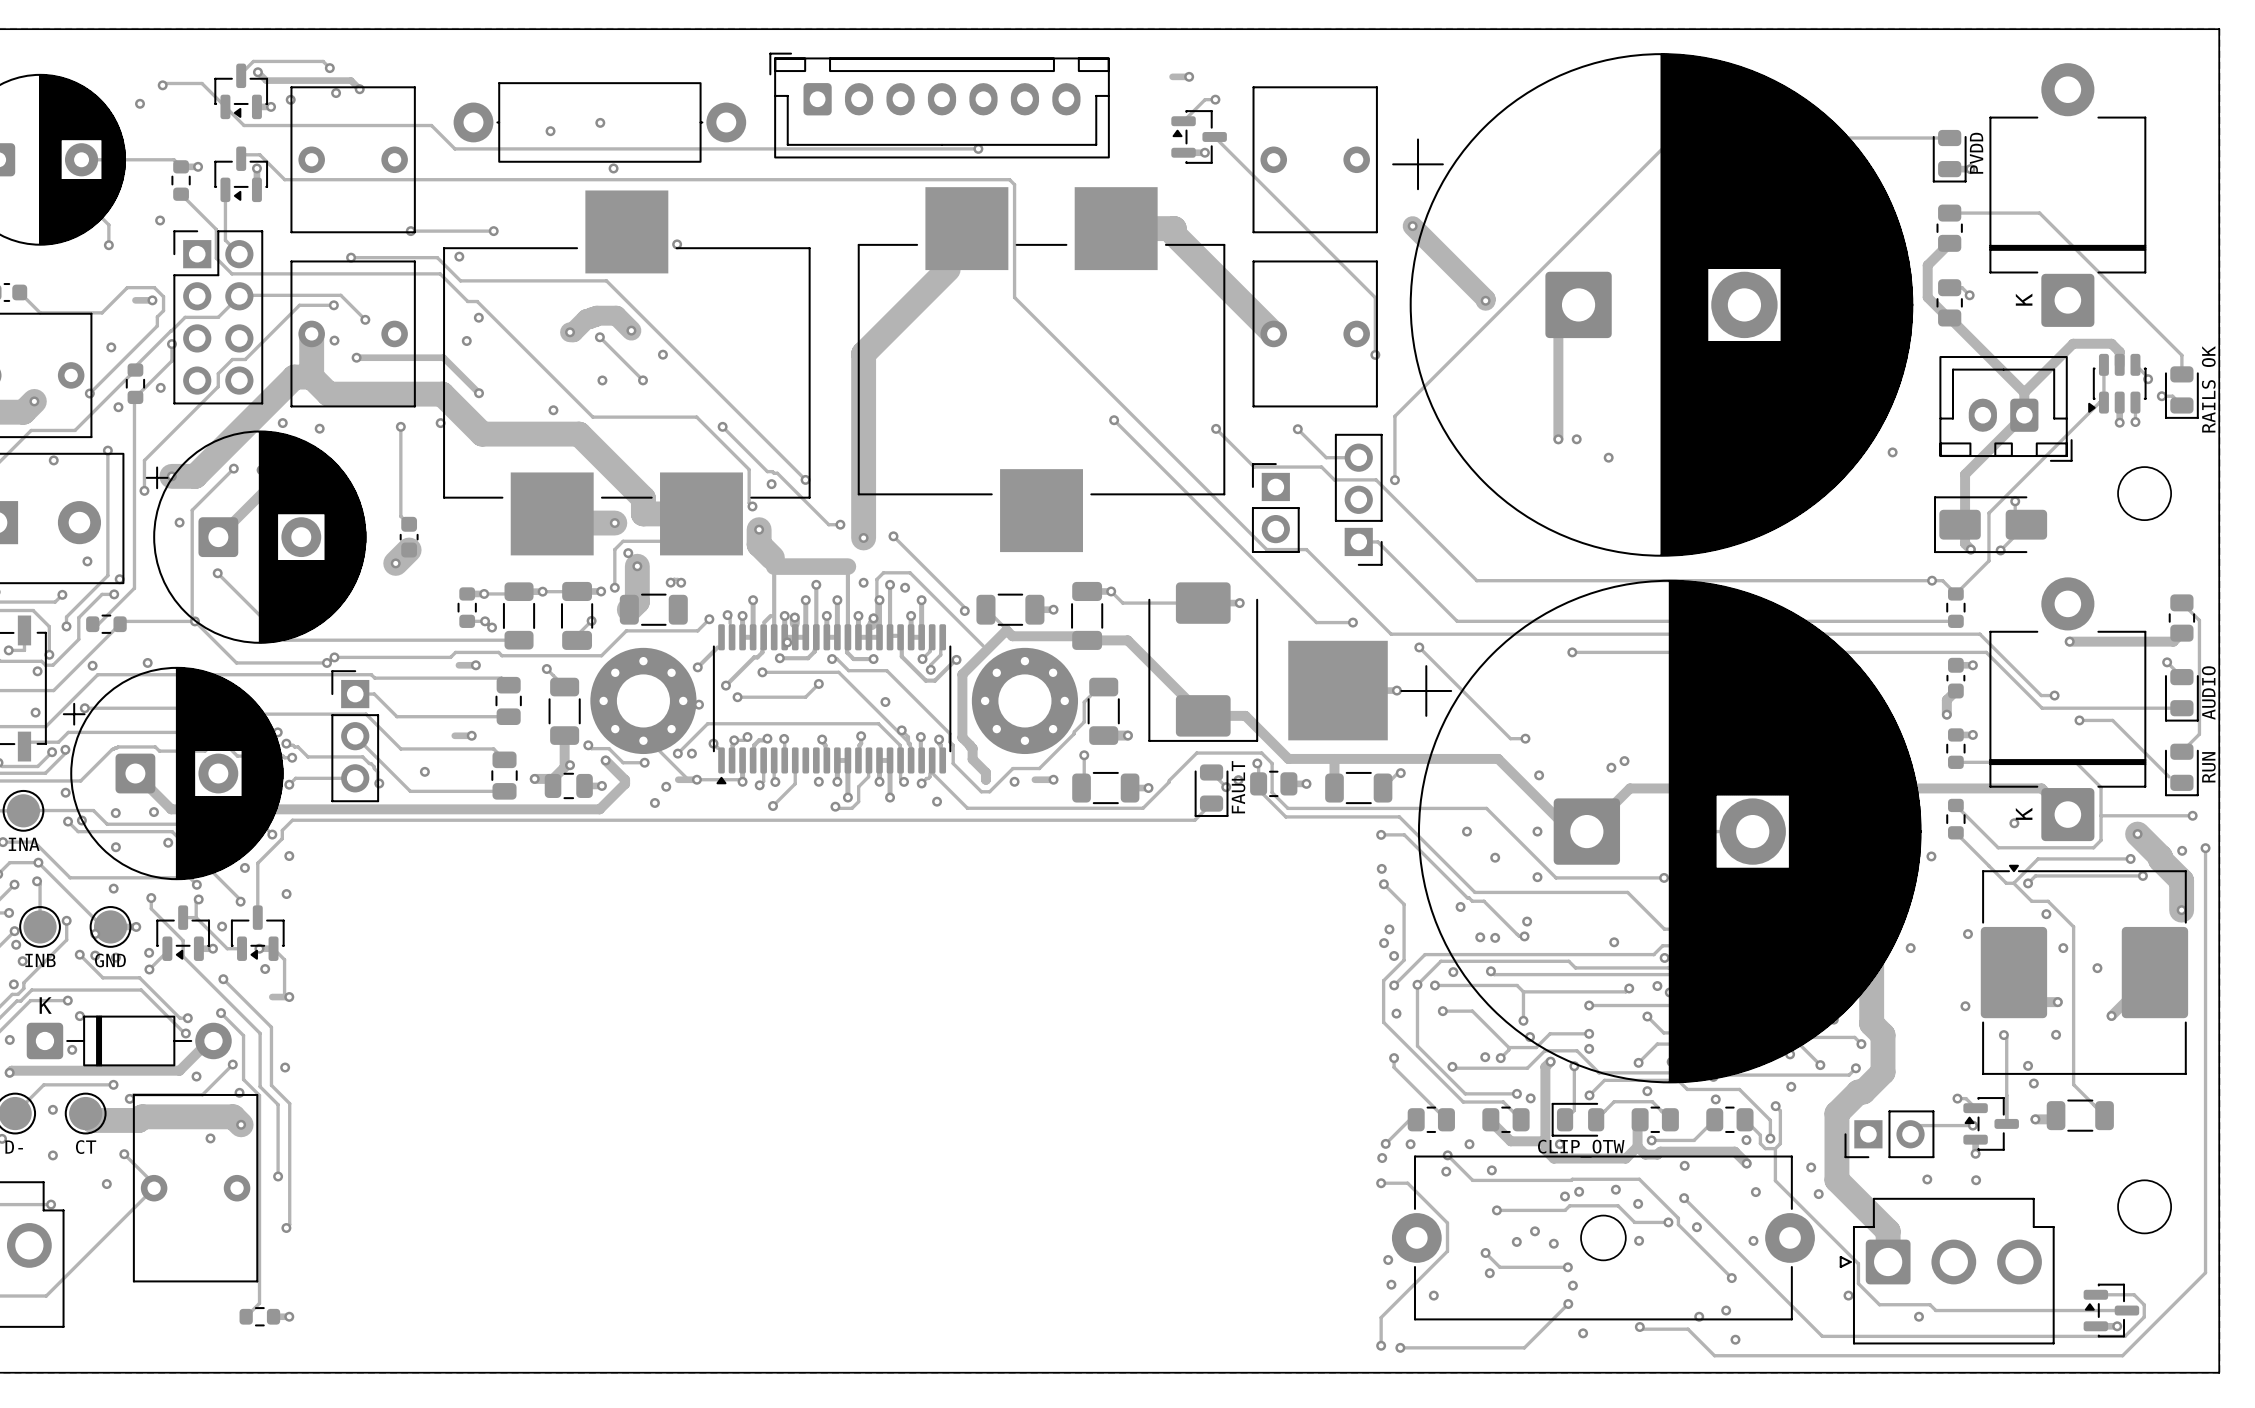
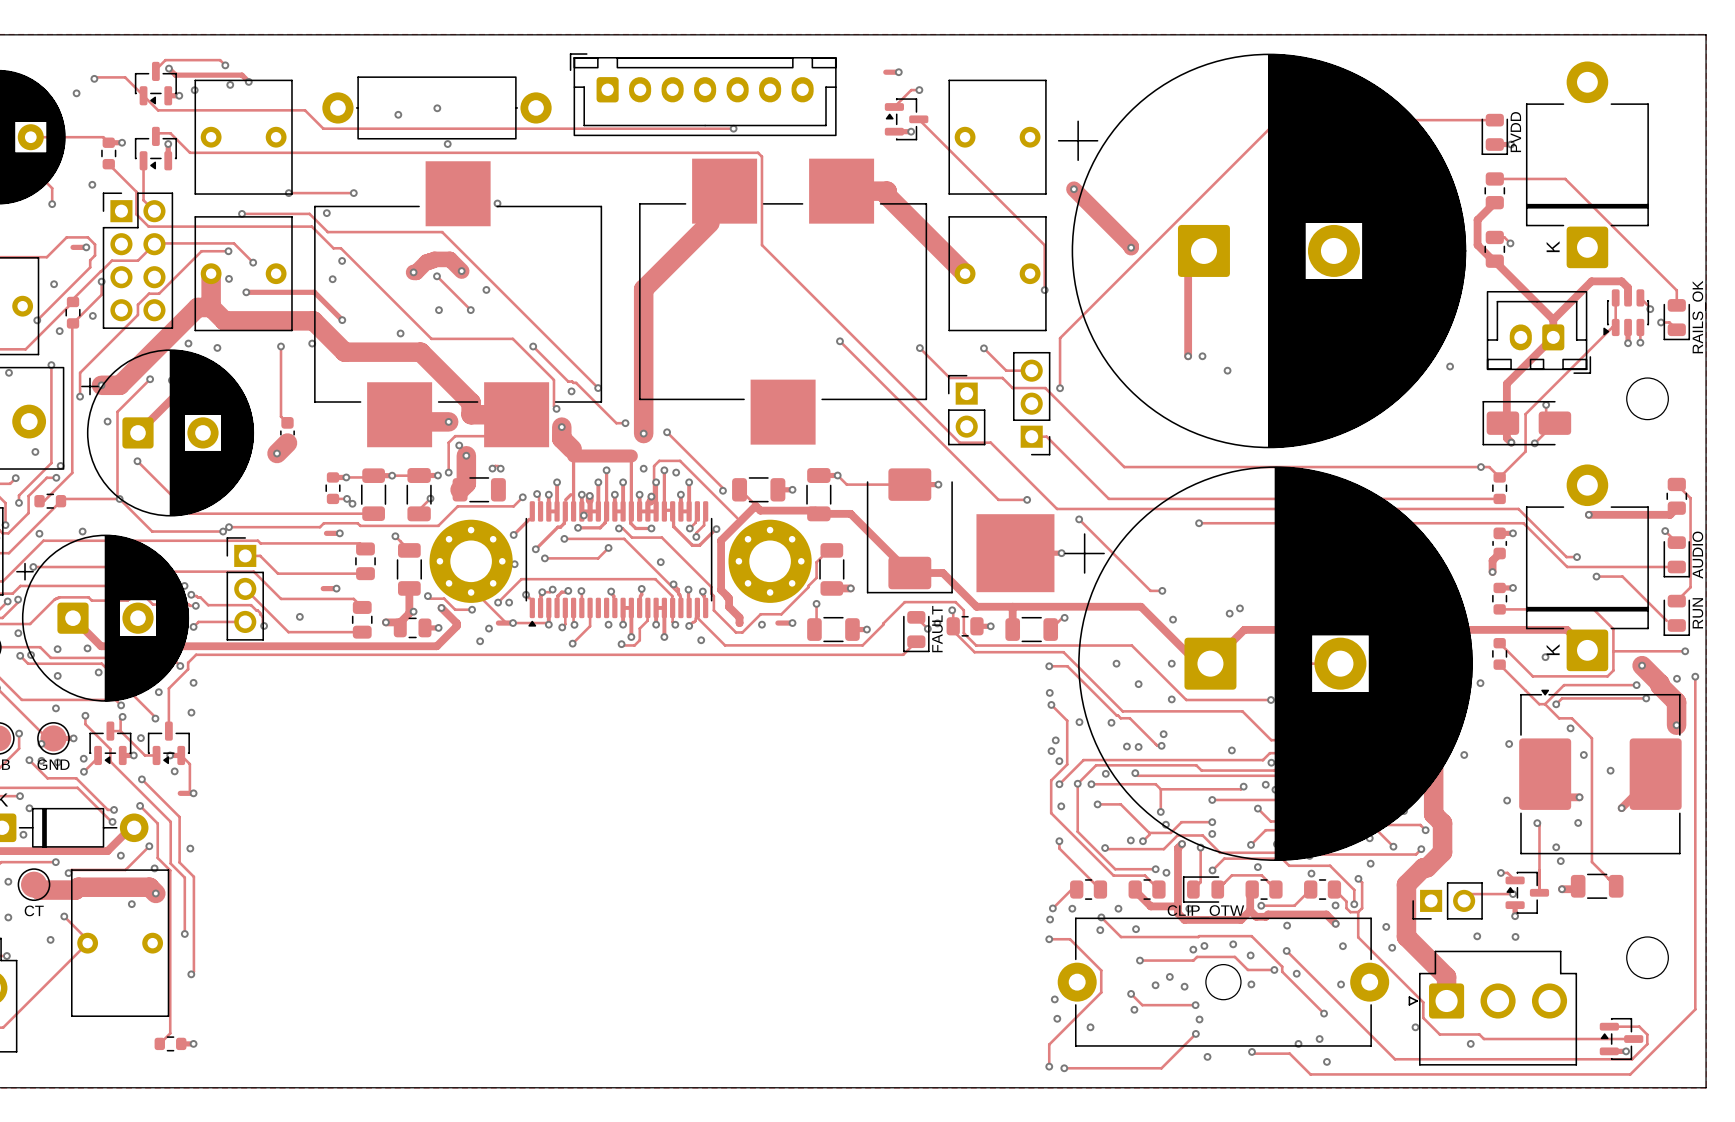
via: none -> (1079, 722)

